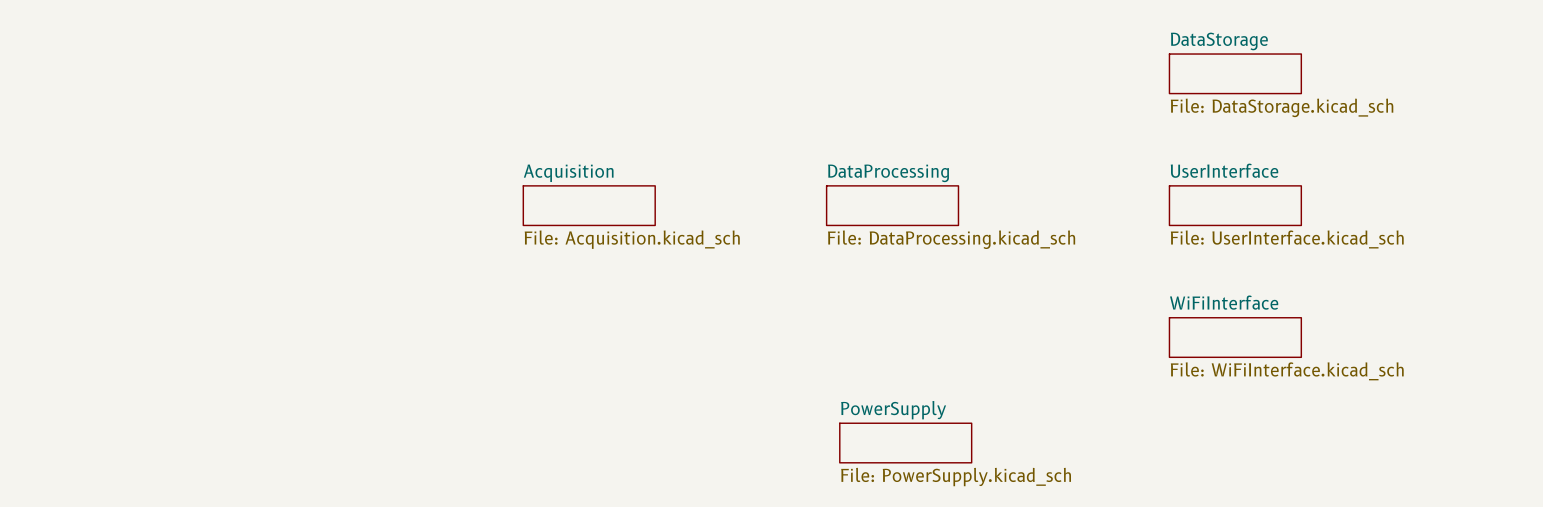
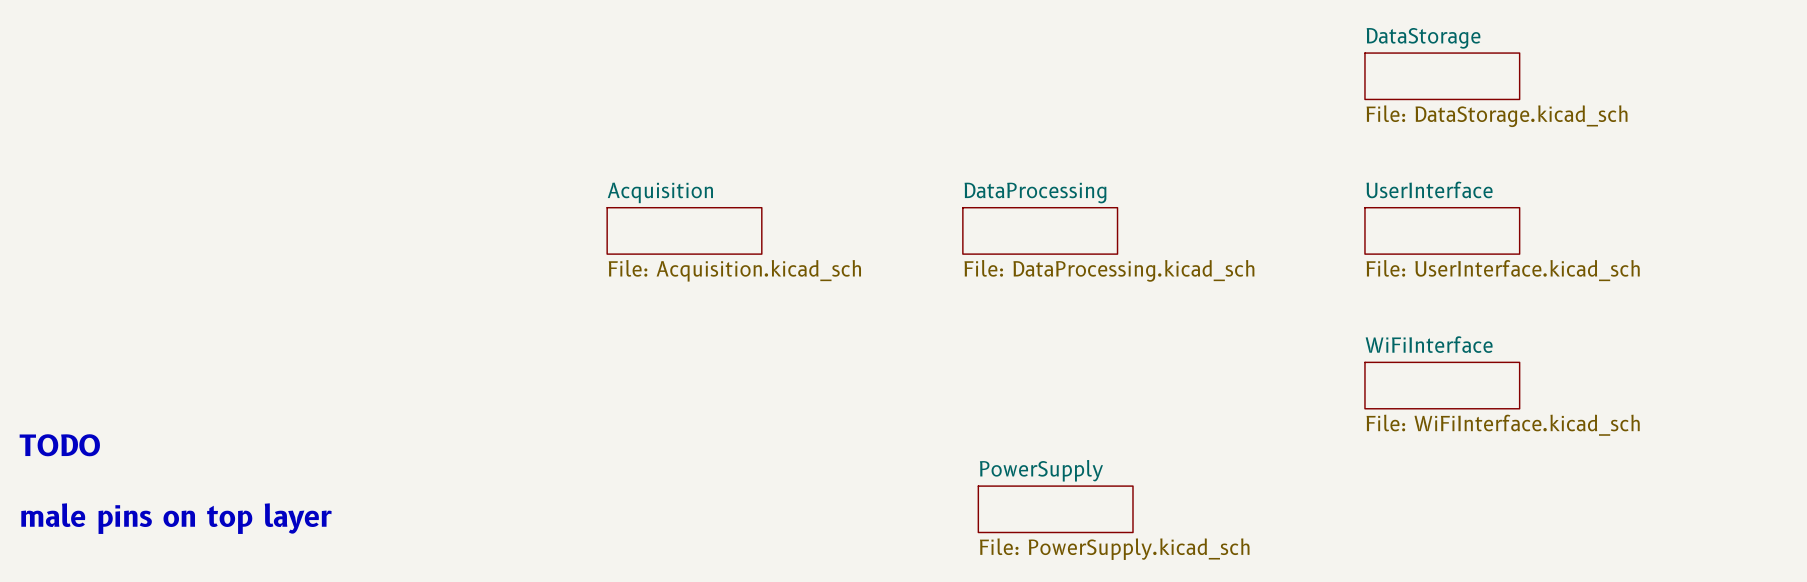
text: none -> TODO (59, 445)
text: none -> male pins on top layer (176, 518)

